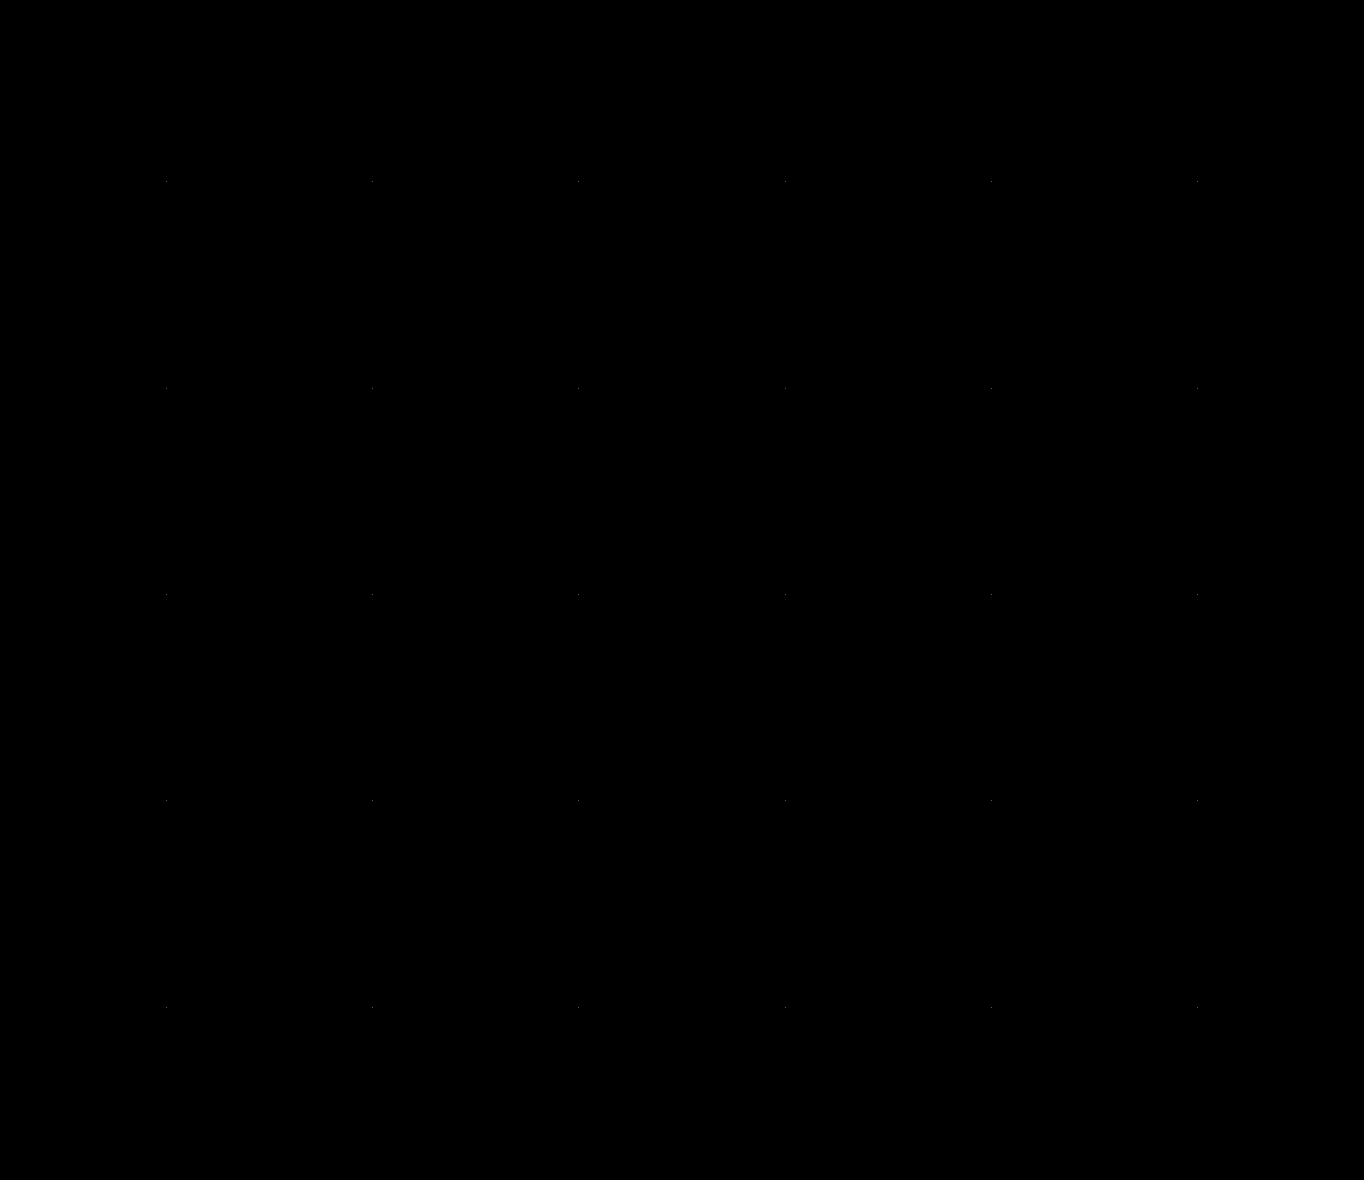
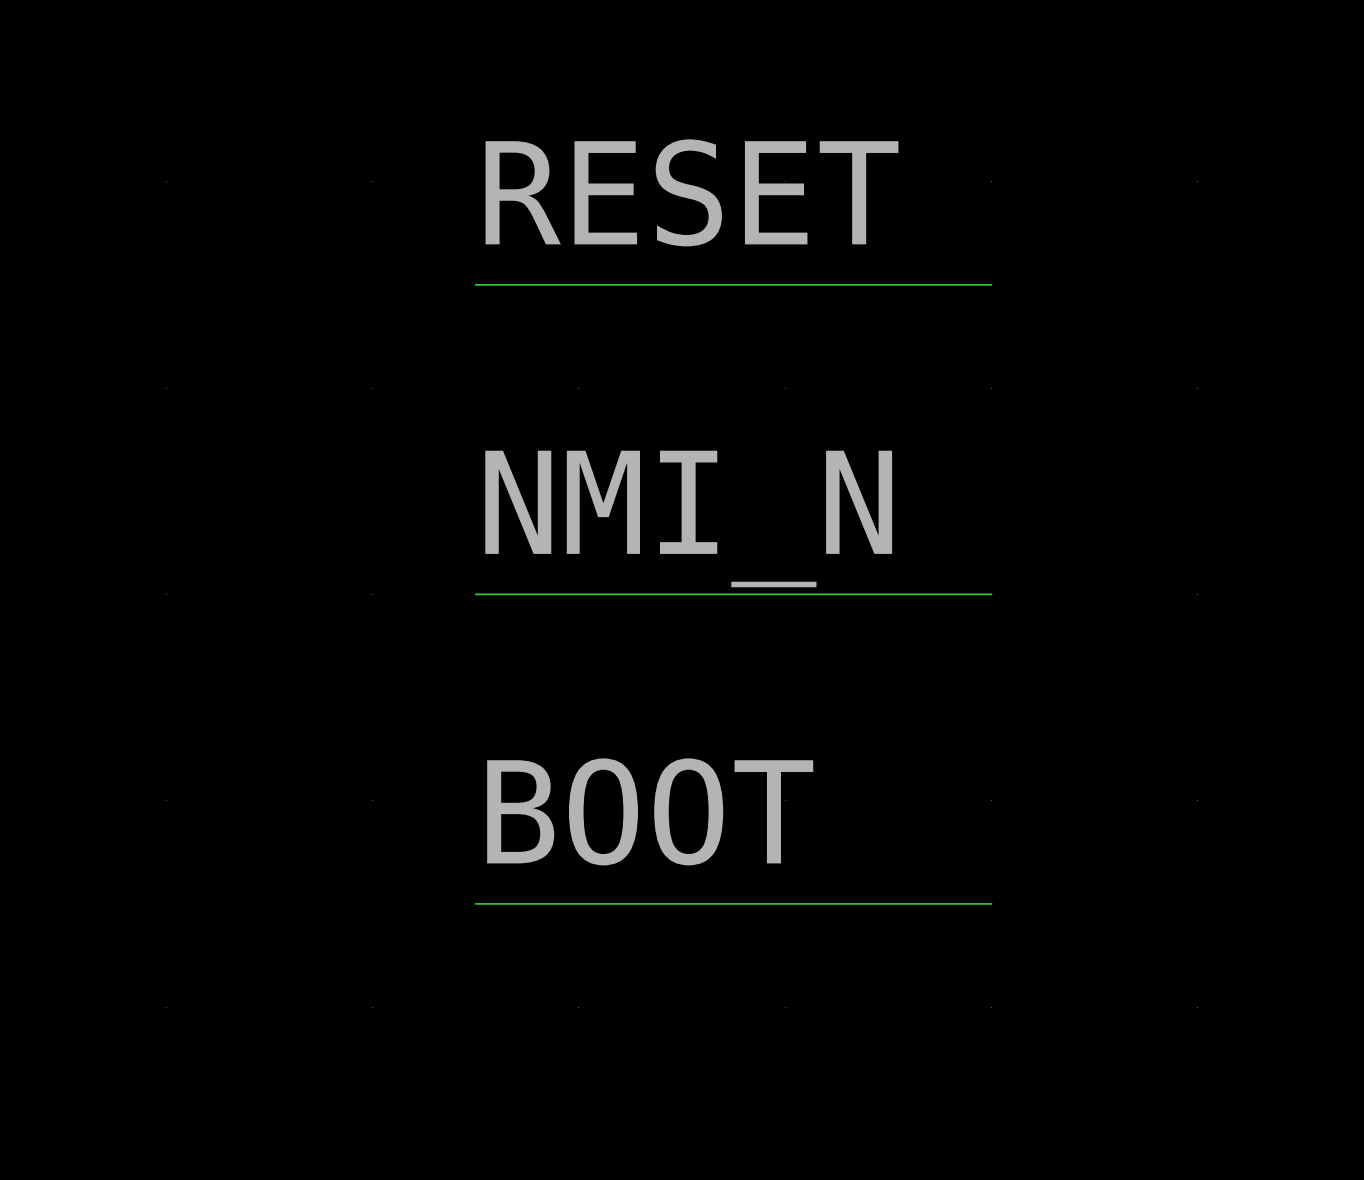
label: none -> RESET (691, 192)
wire: none -> (475, 284) (991, 284)
label: none -> NMI_N (688, 518)
wire: none -> (475, 594) (991, 594)
label: none -> BOOT (650, 811)
wire: none -> (475, 903) (991, 903)

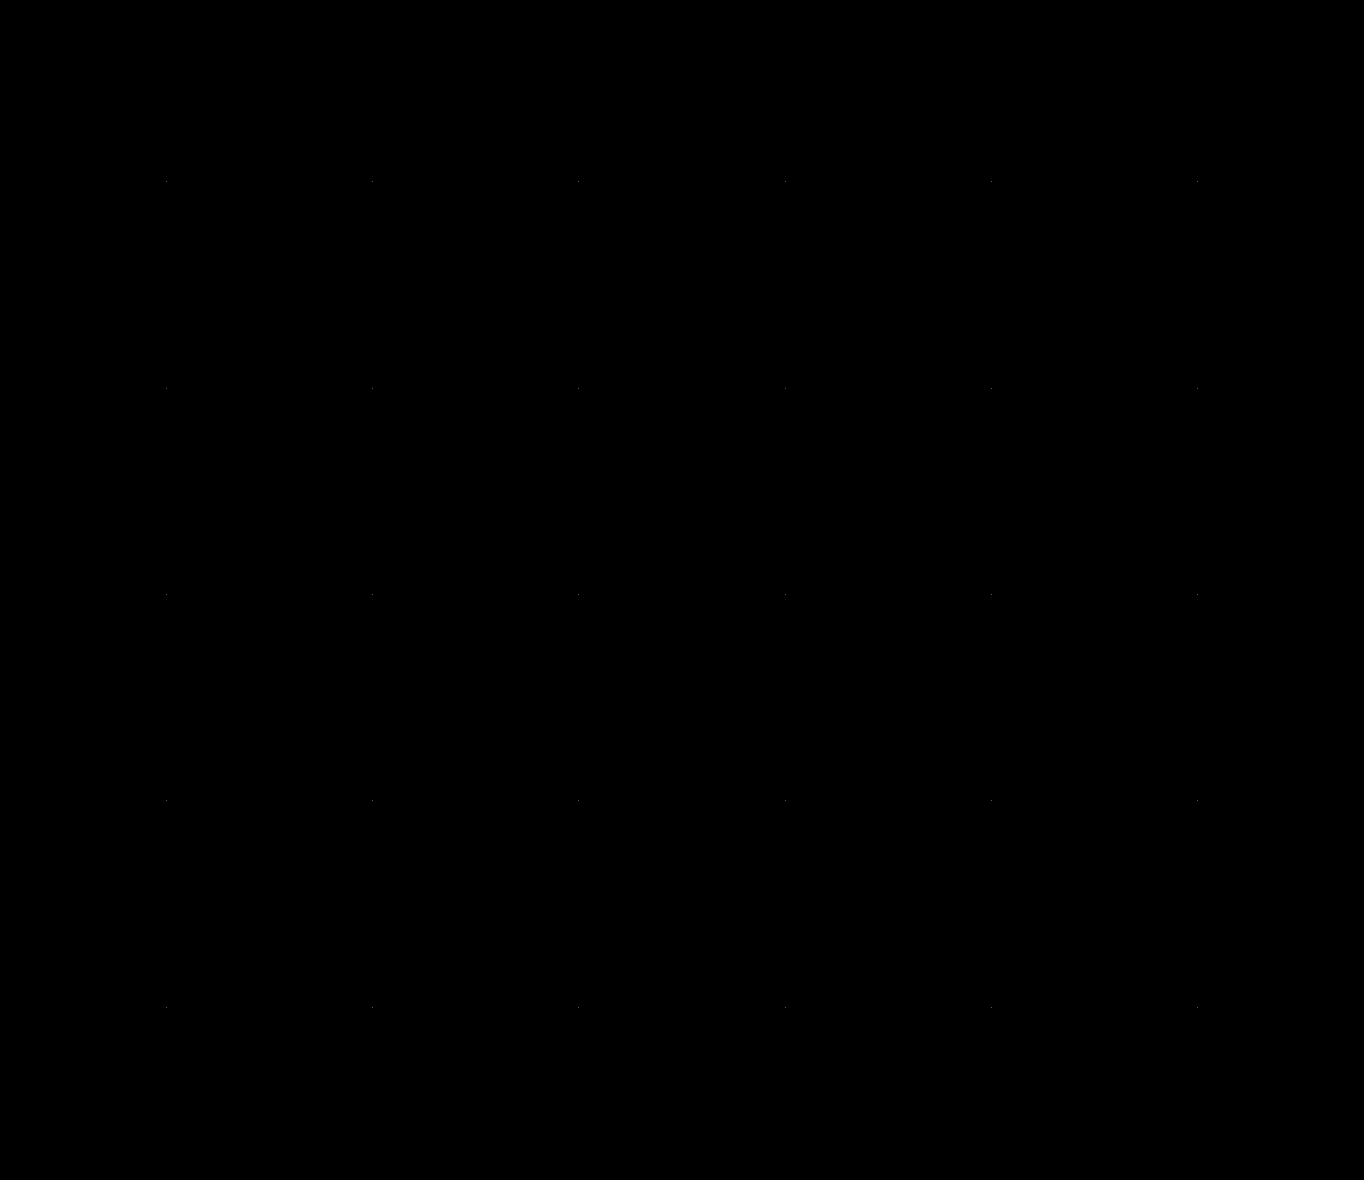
label: RESET (691, 192) -> none
wire: (475, 284) (991, 284) -> none
label: NMI_N (688, 518) -> none
wire: (475, 594) (991, 594) -> none
label: BOOT (650, 811) -> none
wire: (475, 903) (991, 903) -> none

